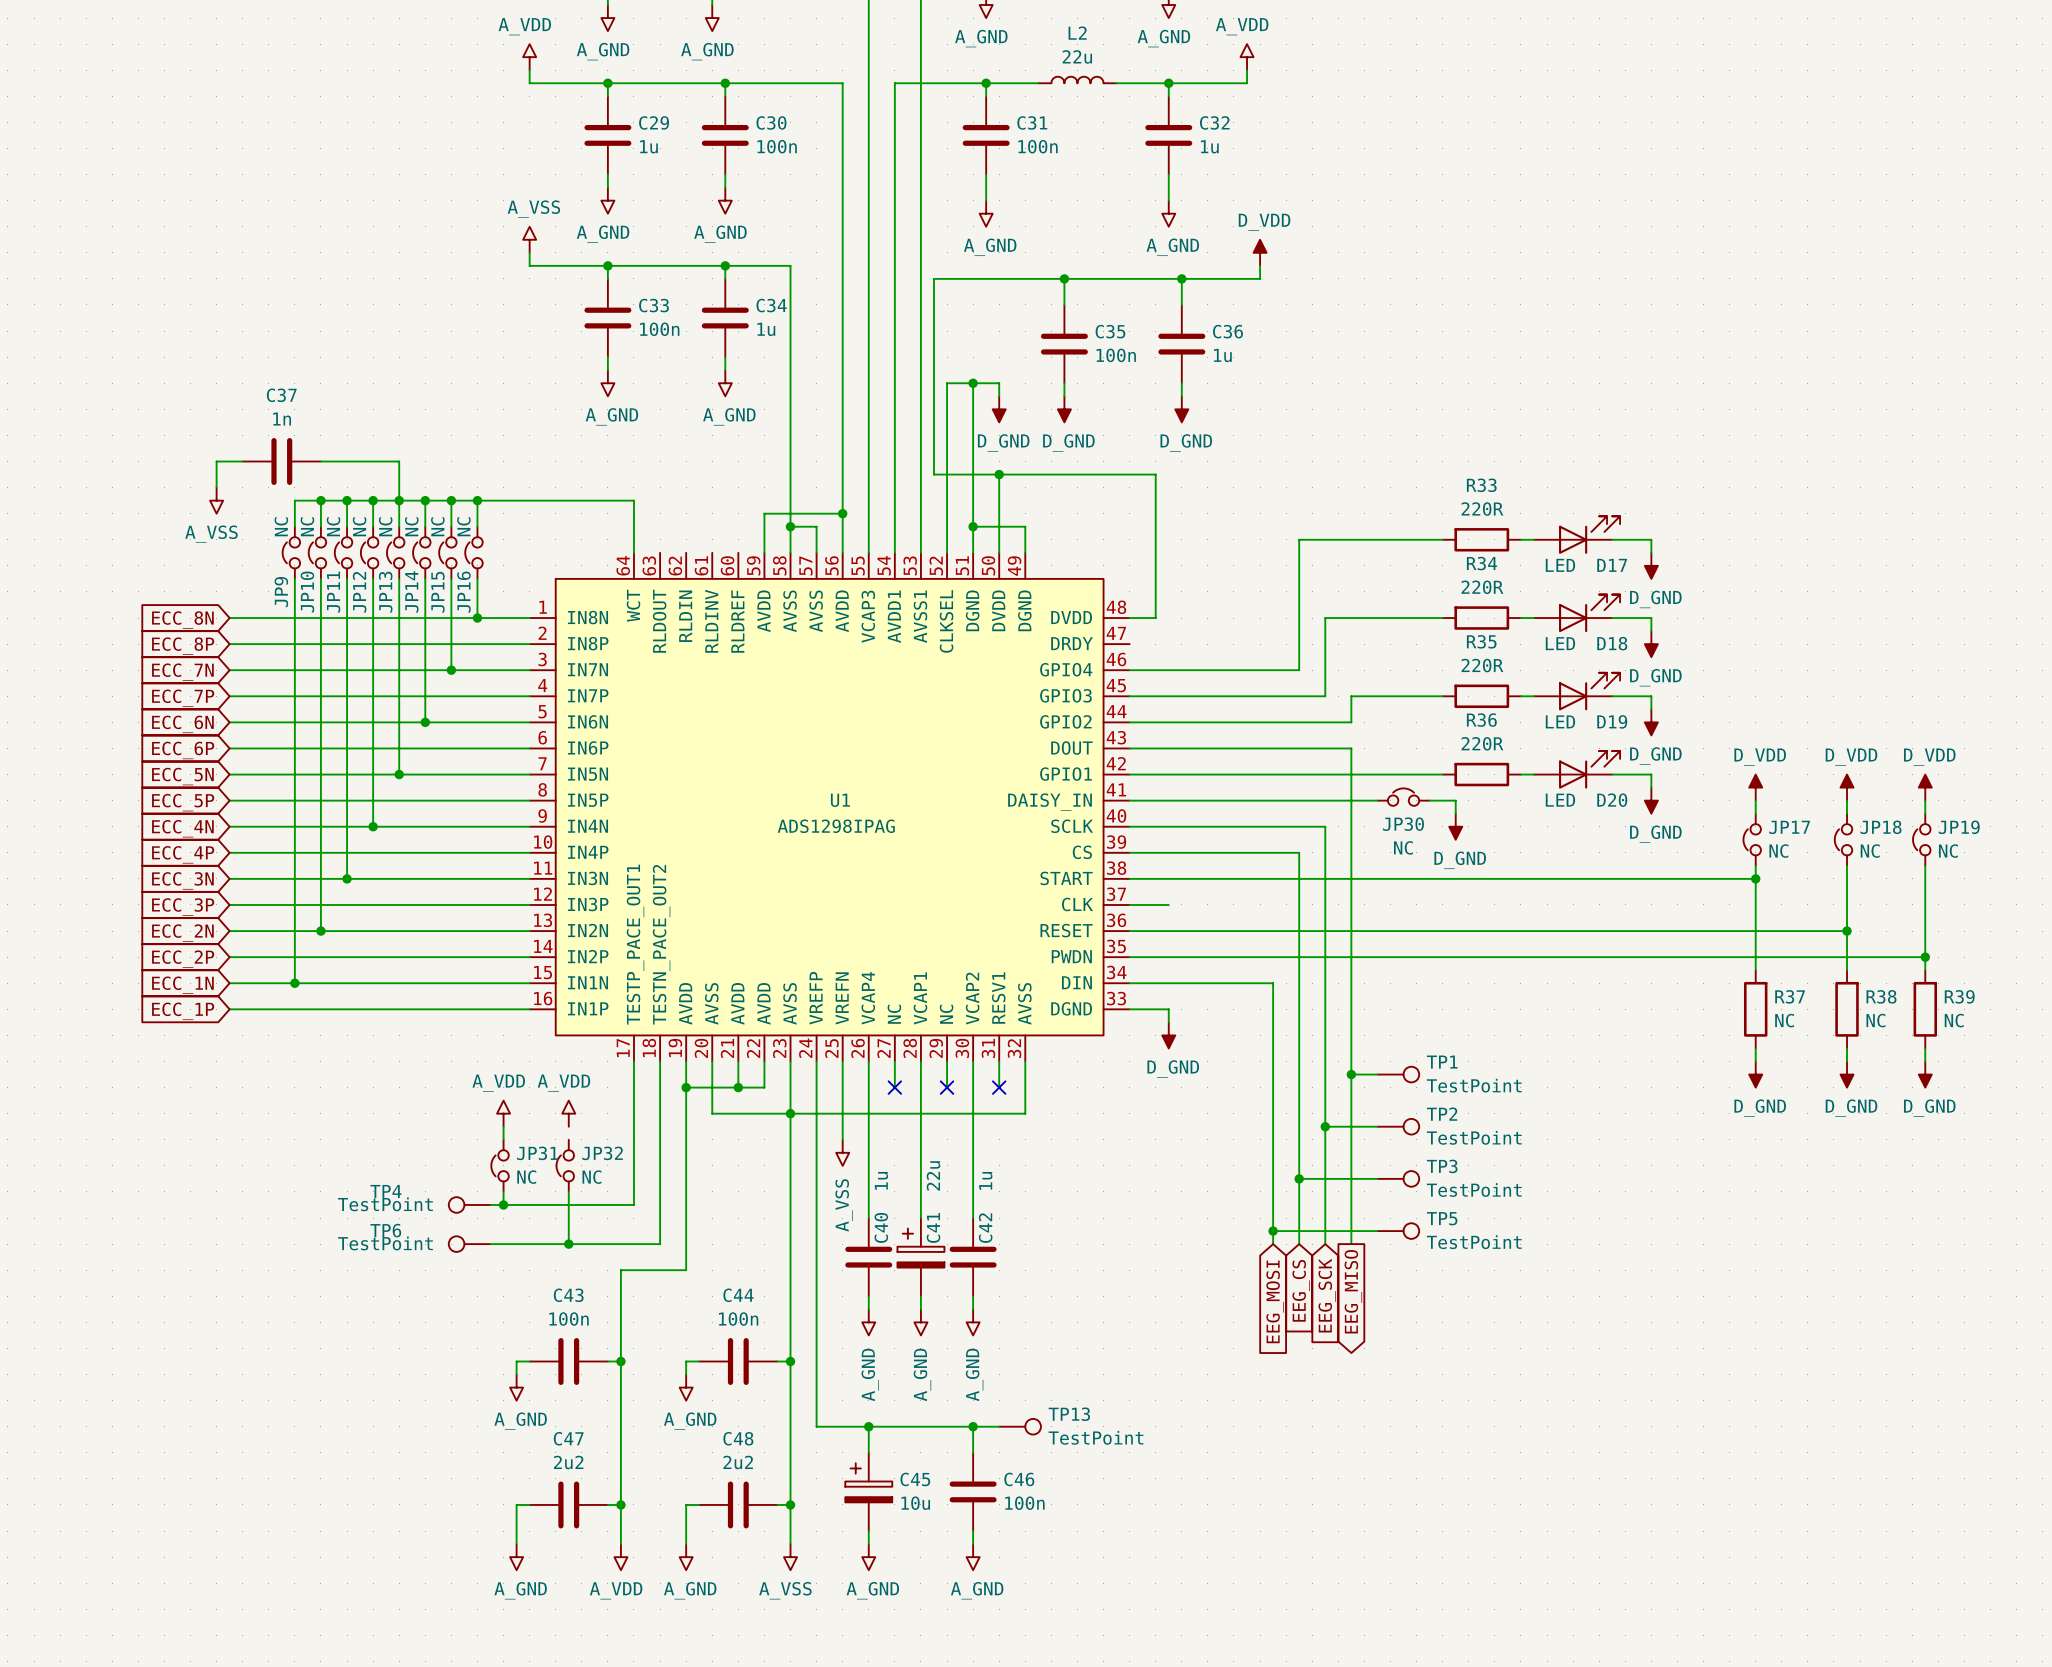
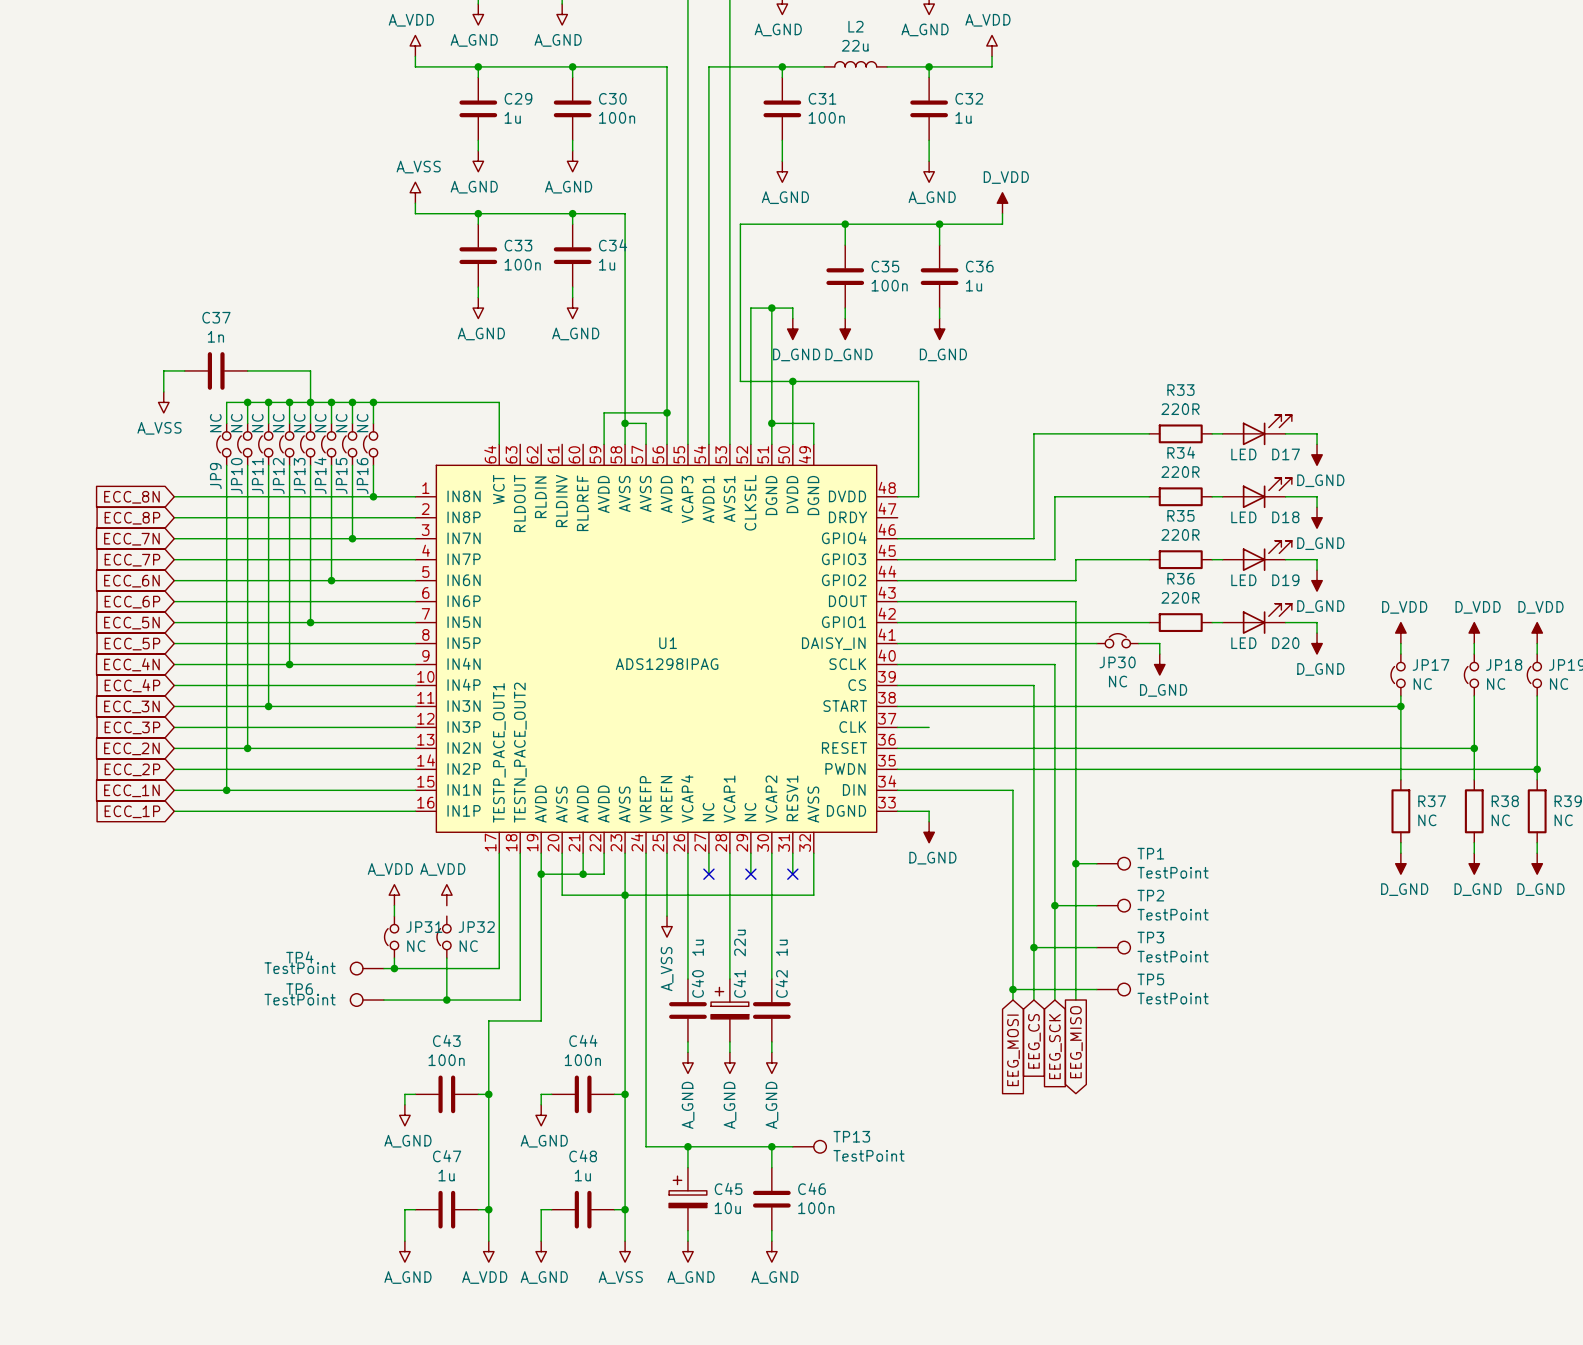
C47 value: 2u2 (568, 1462) -> 1u (446, 1175)
C48 value: 2u2 (738, 1462) -> 1u (582, 1175)

